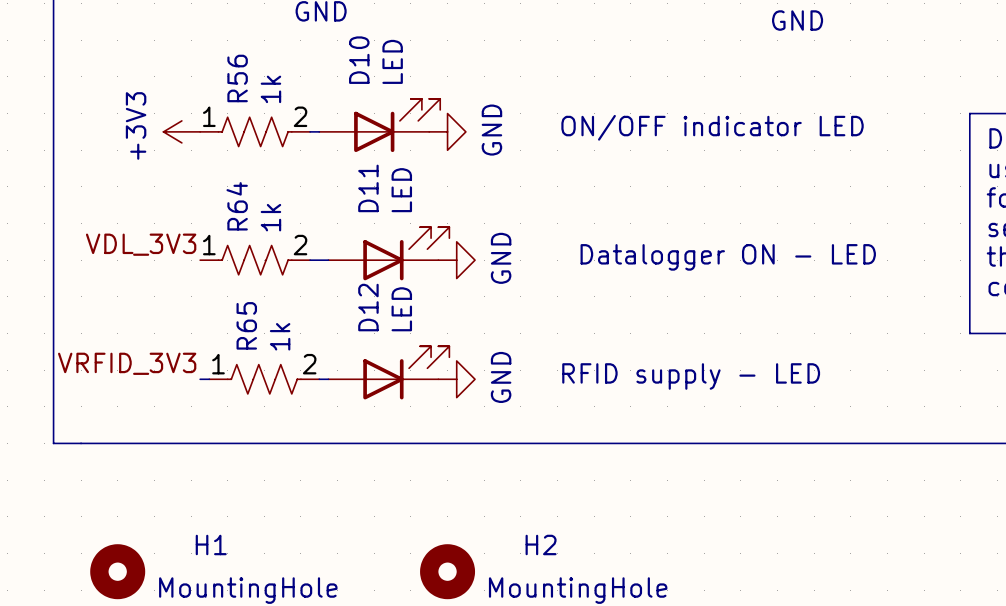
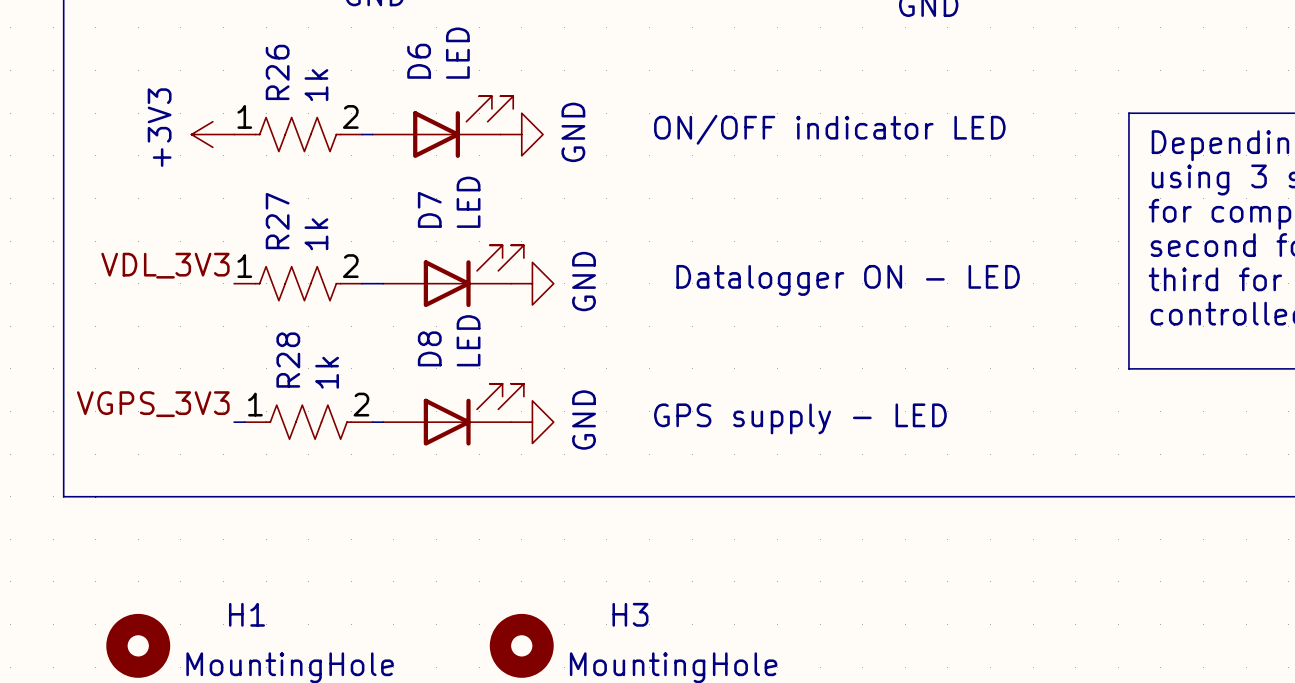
D10 name: D10 (359, 60) -> D6 (419, 61)
R56 name: R56 (237, 78) -> R26 (277, 72)
D11 name: D11 (368, 188) -> D7 (429, 209)
R64 name: R64 (237, 206) -> R27 (277, 221)
D12 name: D12 (368, 307) -> D8 (429, 348)
R65 name: R65 (246, 325) -> R28 (288, 360)
label: VRFID_3V3 (127, 363) -> VGPS_3V3 (153, 404)
text: RFID supply - LED (691, 376) -> GPS supply - LED (800, 418)
H2 name: H2 (541, 544) -> H3 (630, 614)

